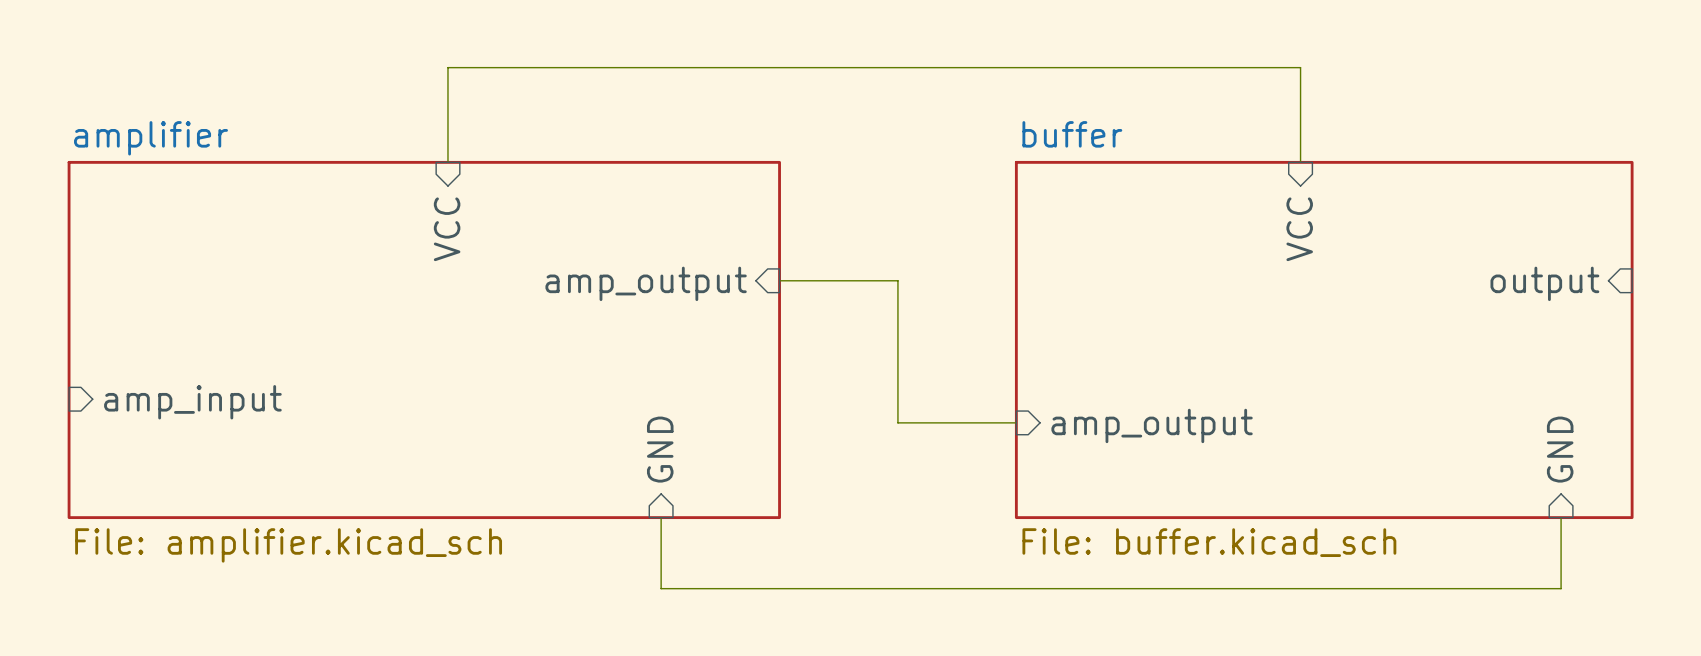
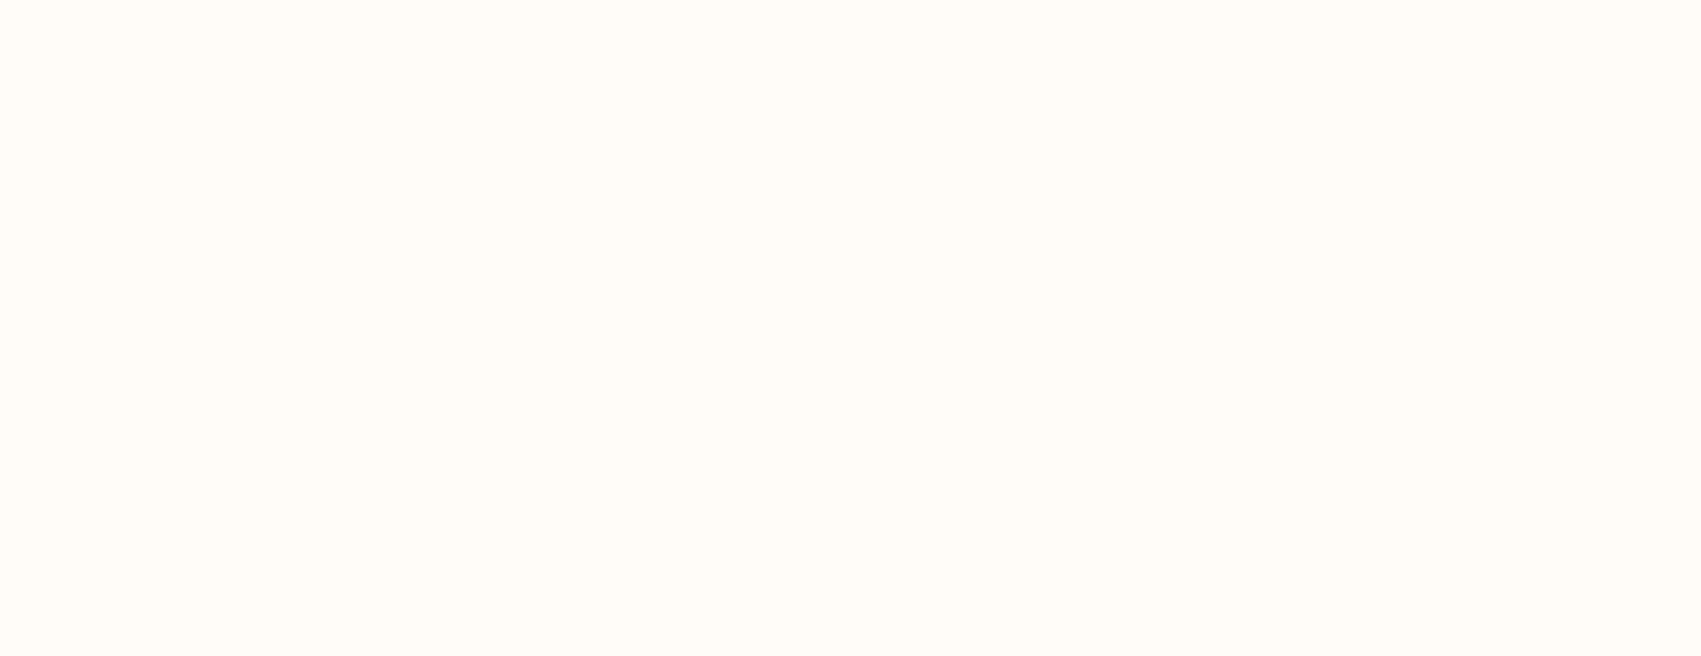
wire: (447, 162) (447, 67) (1300, 67) (1300, 162) -> none
sheet pin: VCC (447, 229) -> none
sheet pin: VCC (1299, 229) -> none
wire: (779, 280) (897, 280) (897, 422) (1016, 422) -> none
sheet pin: amp_output (646, 283) -> none
sheet pin: output (1544, 283) -> none
sheet amplifier: File: amplifier.kicad_sch (424, 339) -> none
sheet buffer: File: buffer.kicad_sch (1324, 339) -> none
sheet pin: amp_input (192, 402) -> none
sheet pin: amp_output (1152, 425) -> none
sheet pin: GND (660, 449) -> none
sheet pin: GND (1560, 449) -> none
wire: (661, 517) (661, 588) (1561, 588) (1561, 517) -> none

